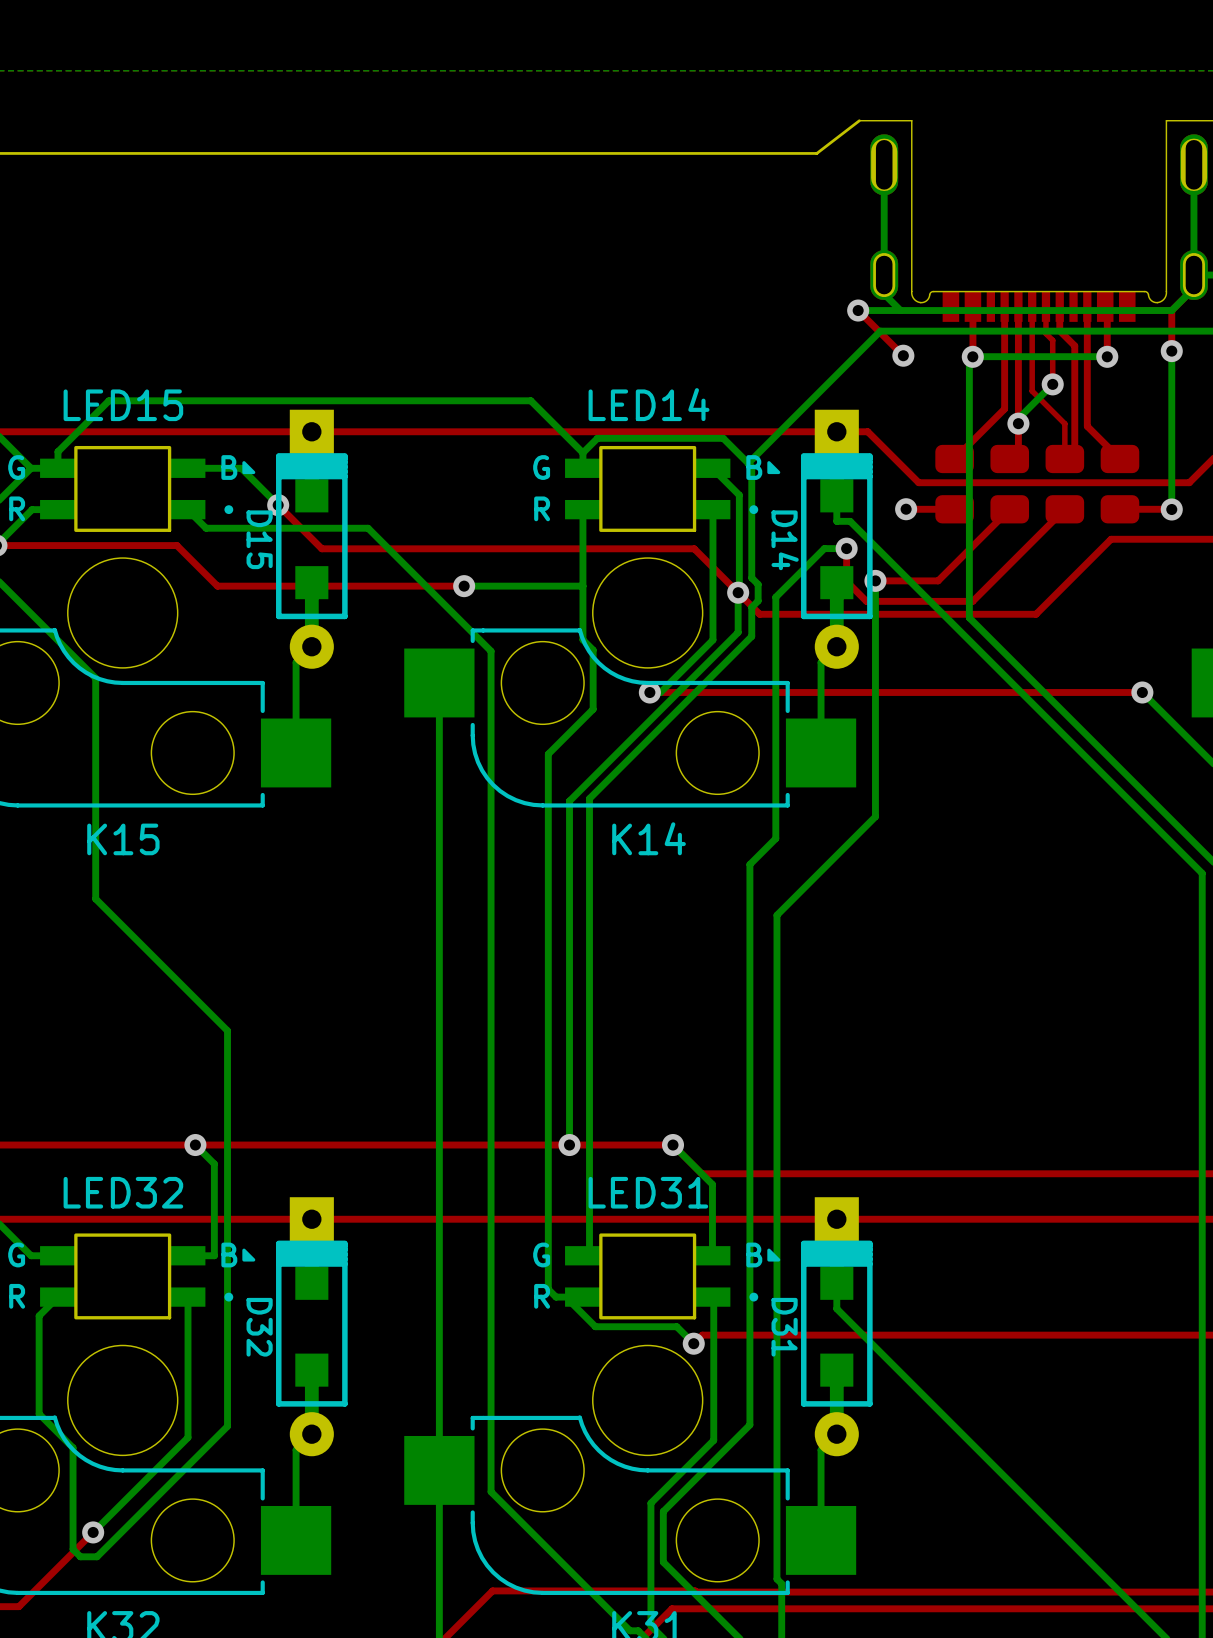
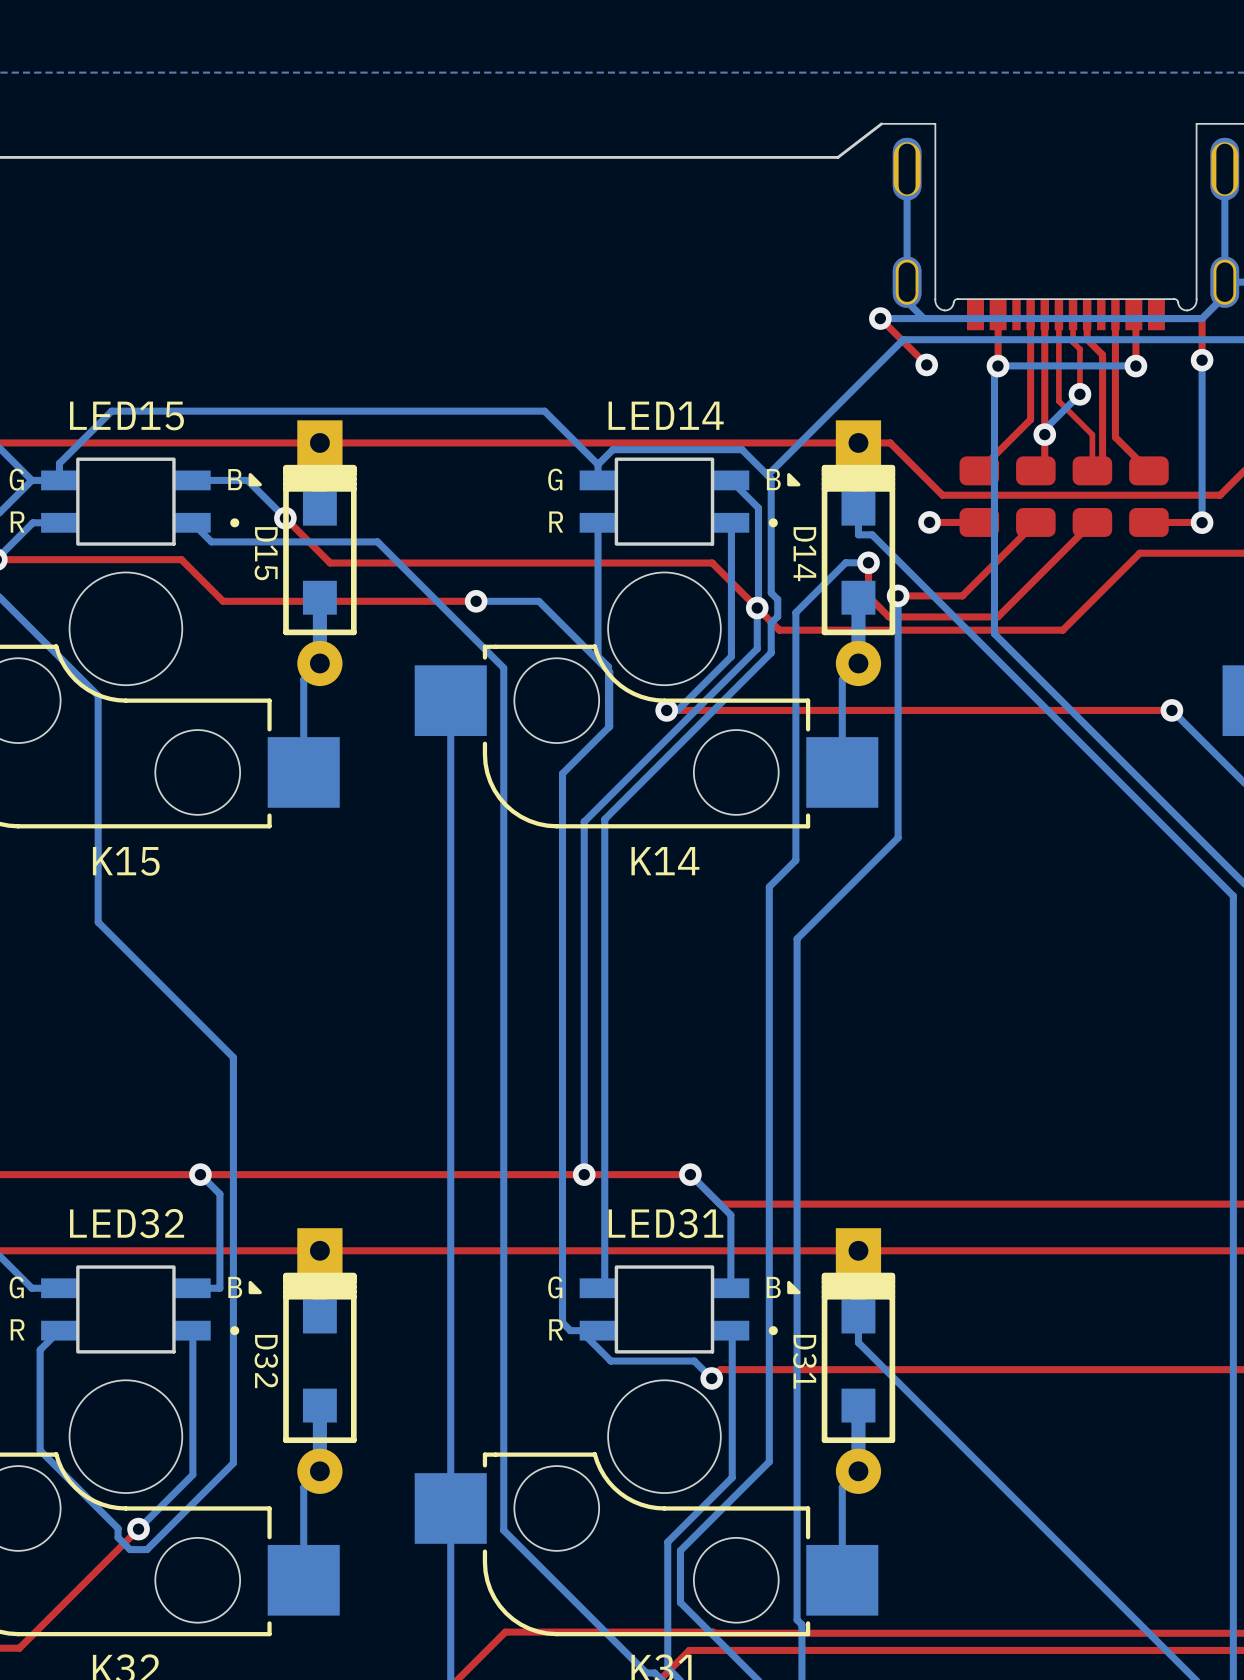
bottom track: (582, 586) (525, 586) -> (608, 727) (609, 672) (538, 601)
bottom track: (73, 1447) (73, 1549) (80, 1556) (97, 1556) (143, 1510) -> (74, 1485) (118, 1528) (118, 1537) (130, 1549) (147, 1549)
bottom track: (135, 1490) (93, 1532) -> none
top track: none -> (138, 1529) (95, 1572)
via position: (93, 1532) -> (138, 1529)

